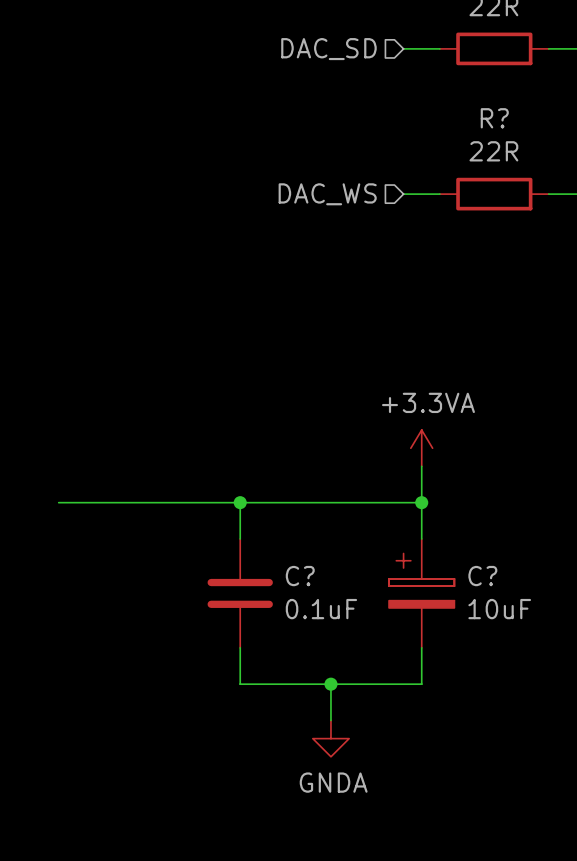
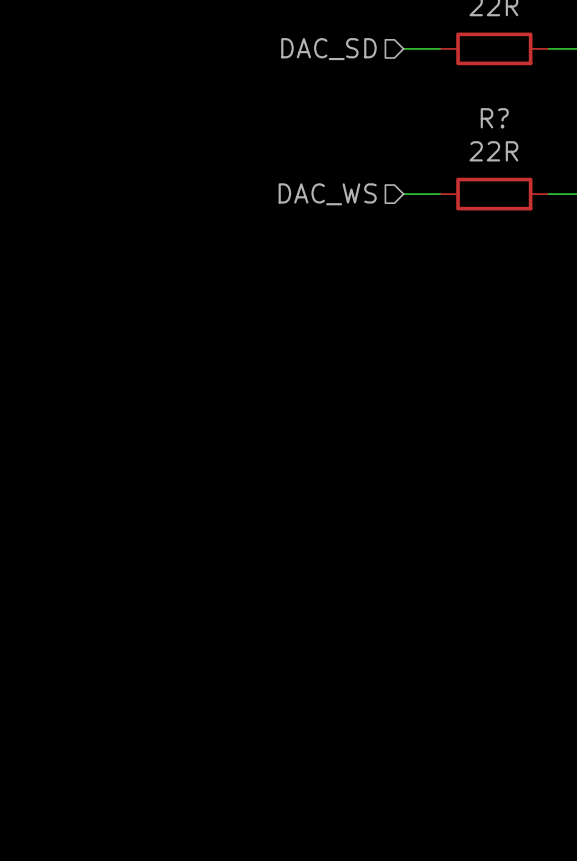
power symbol: +3.3VA (421, 448) -> none
wire: (421, 466) (421, 538) -> none
wire: (58, 502) (421, 502) -> none
wire: (240, 502) (240, 538) -> none
junction: (240, 502) -> none
junction: (421, 502) -> none
C?: 0.1uF (240, 593) -> none
C?: 10uF (421, 593) -> none
wire: (240, 647) (240, 684) (421, 684) (421, 647) -> none
wire: (330, 684) (330, 720) -> none
junction: (330, 684) -> none
power symbol: GNDA (330, 738) -> none

